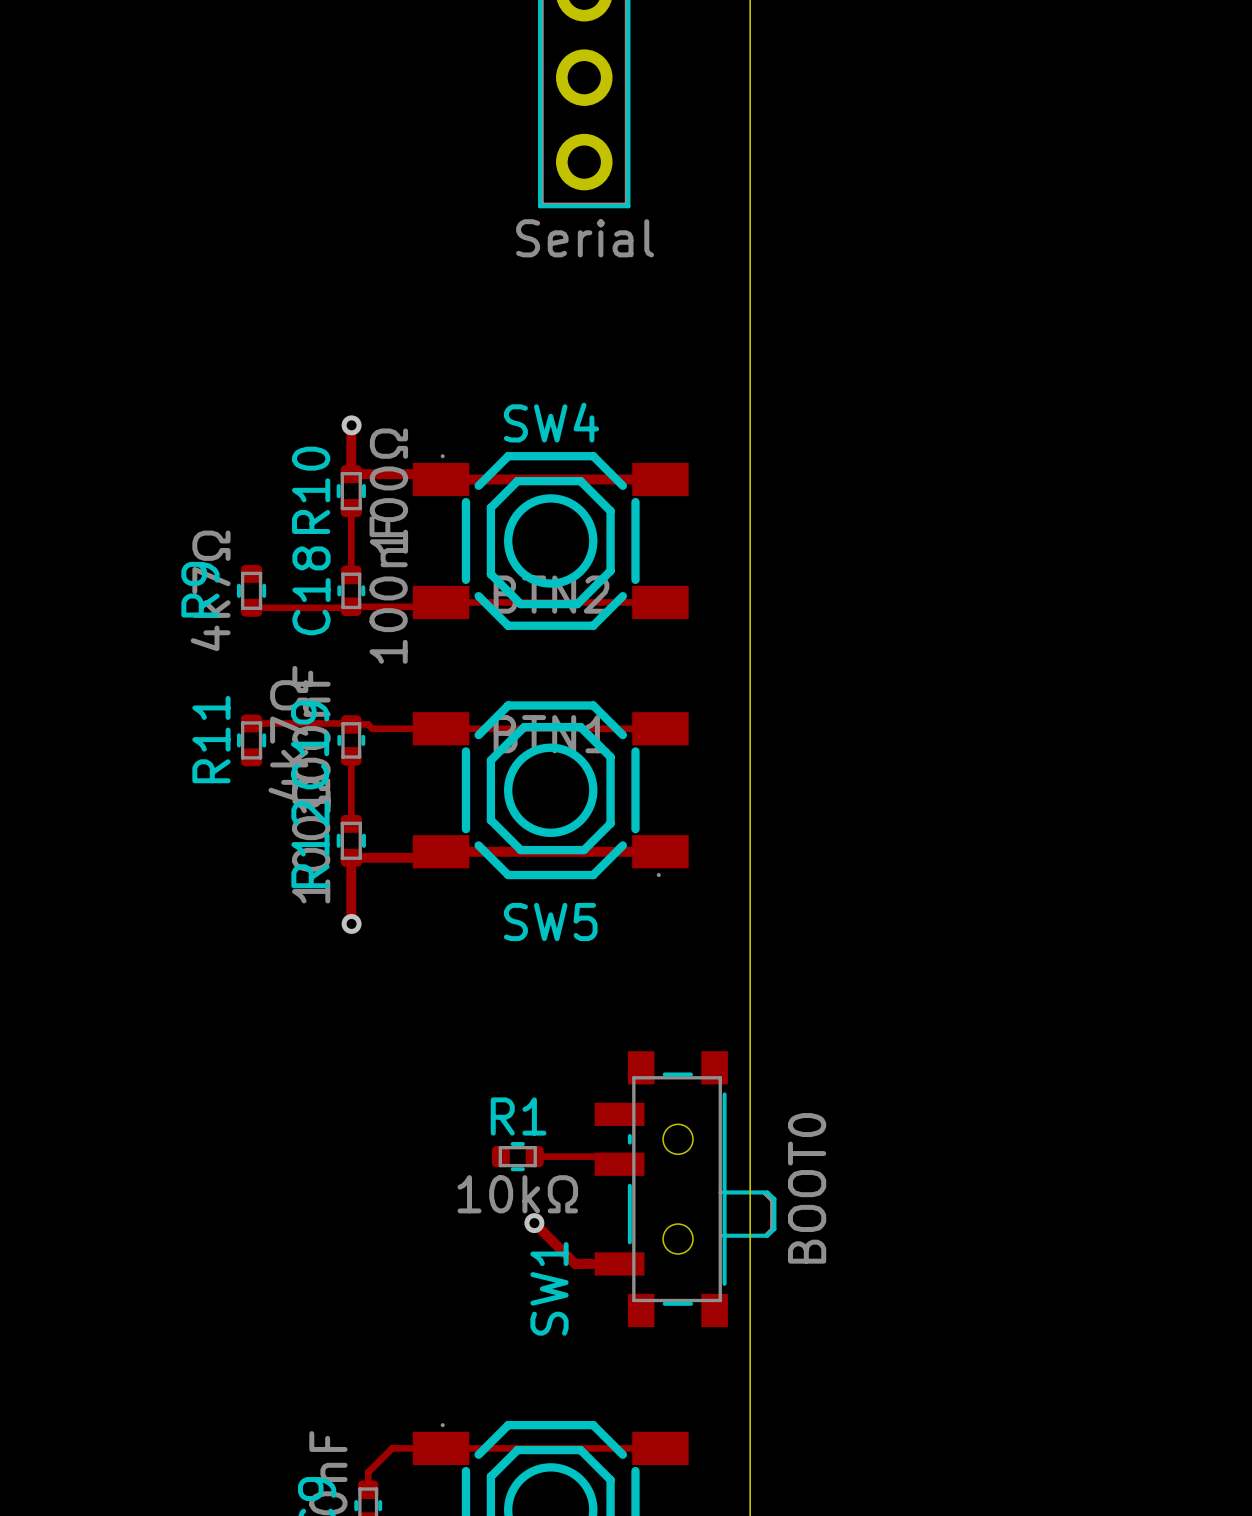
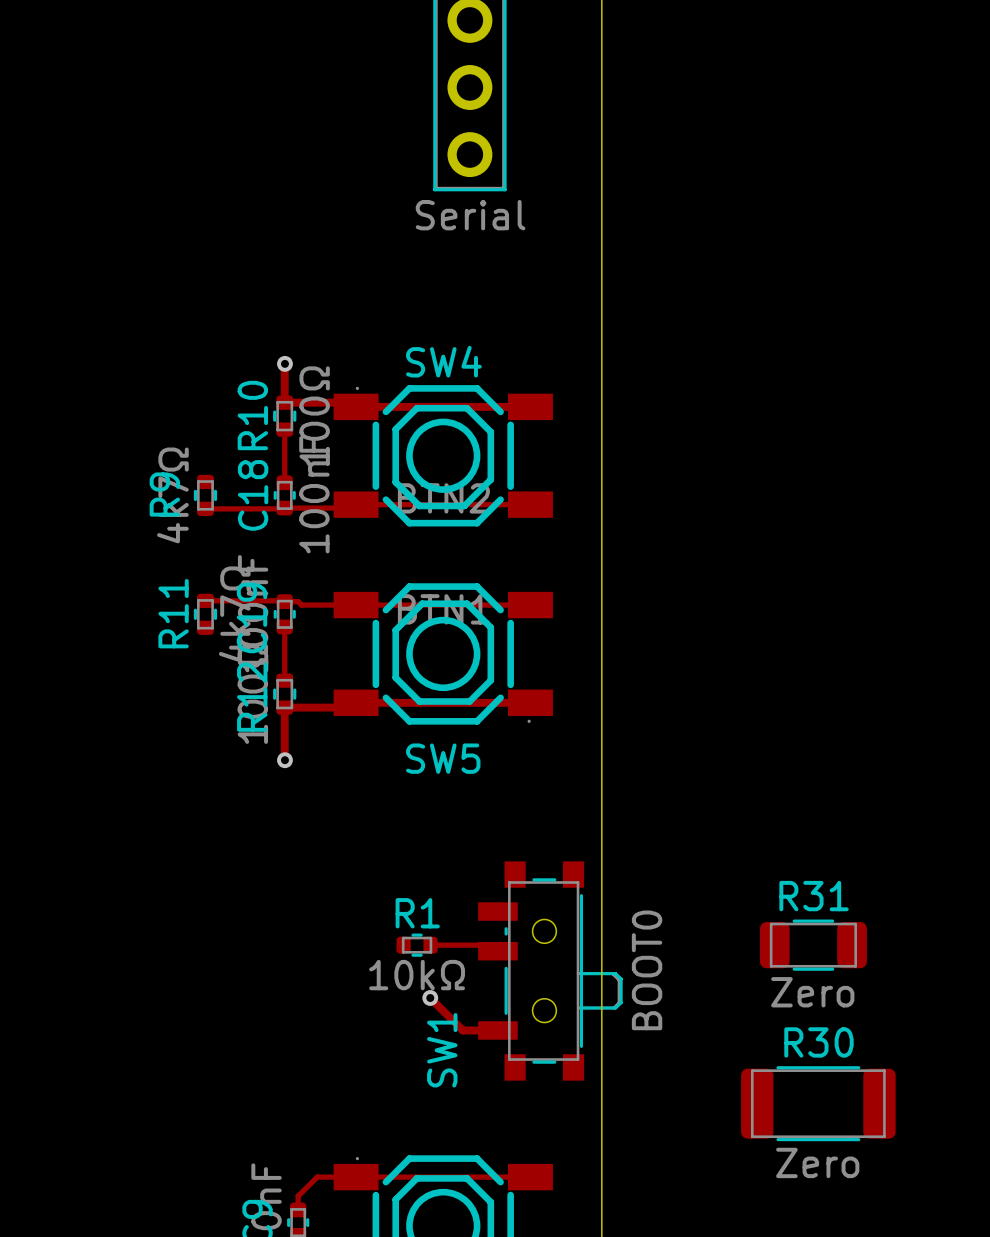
R31: none -> Zero (813, 945)
R30: none -> Zero (818, 1103)

